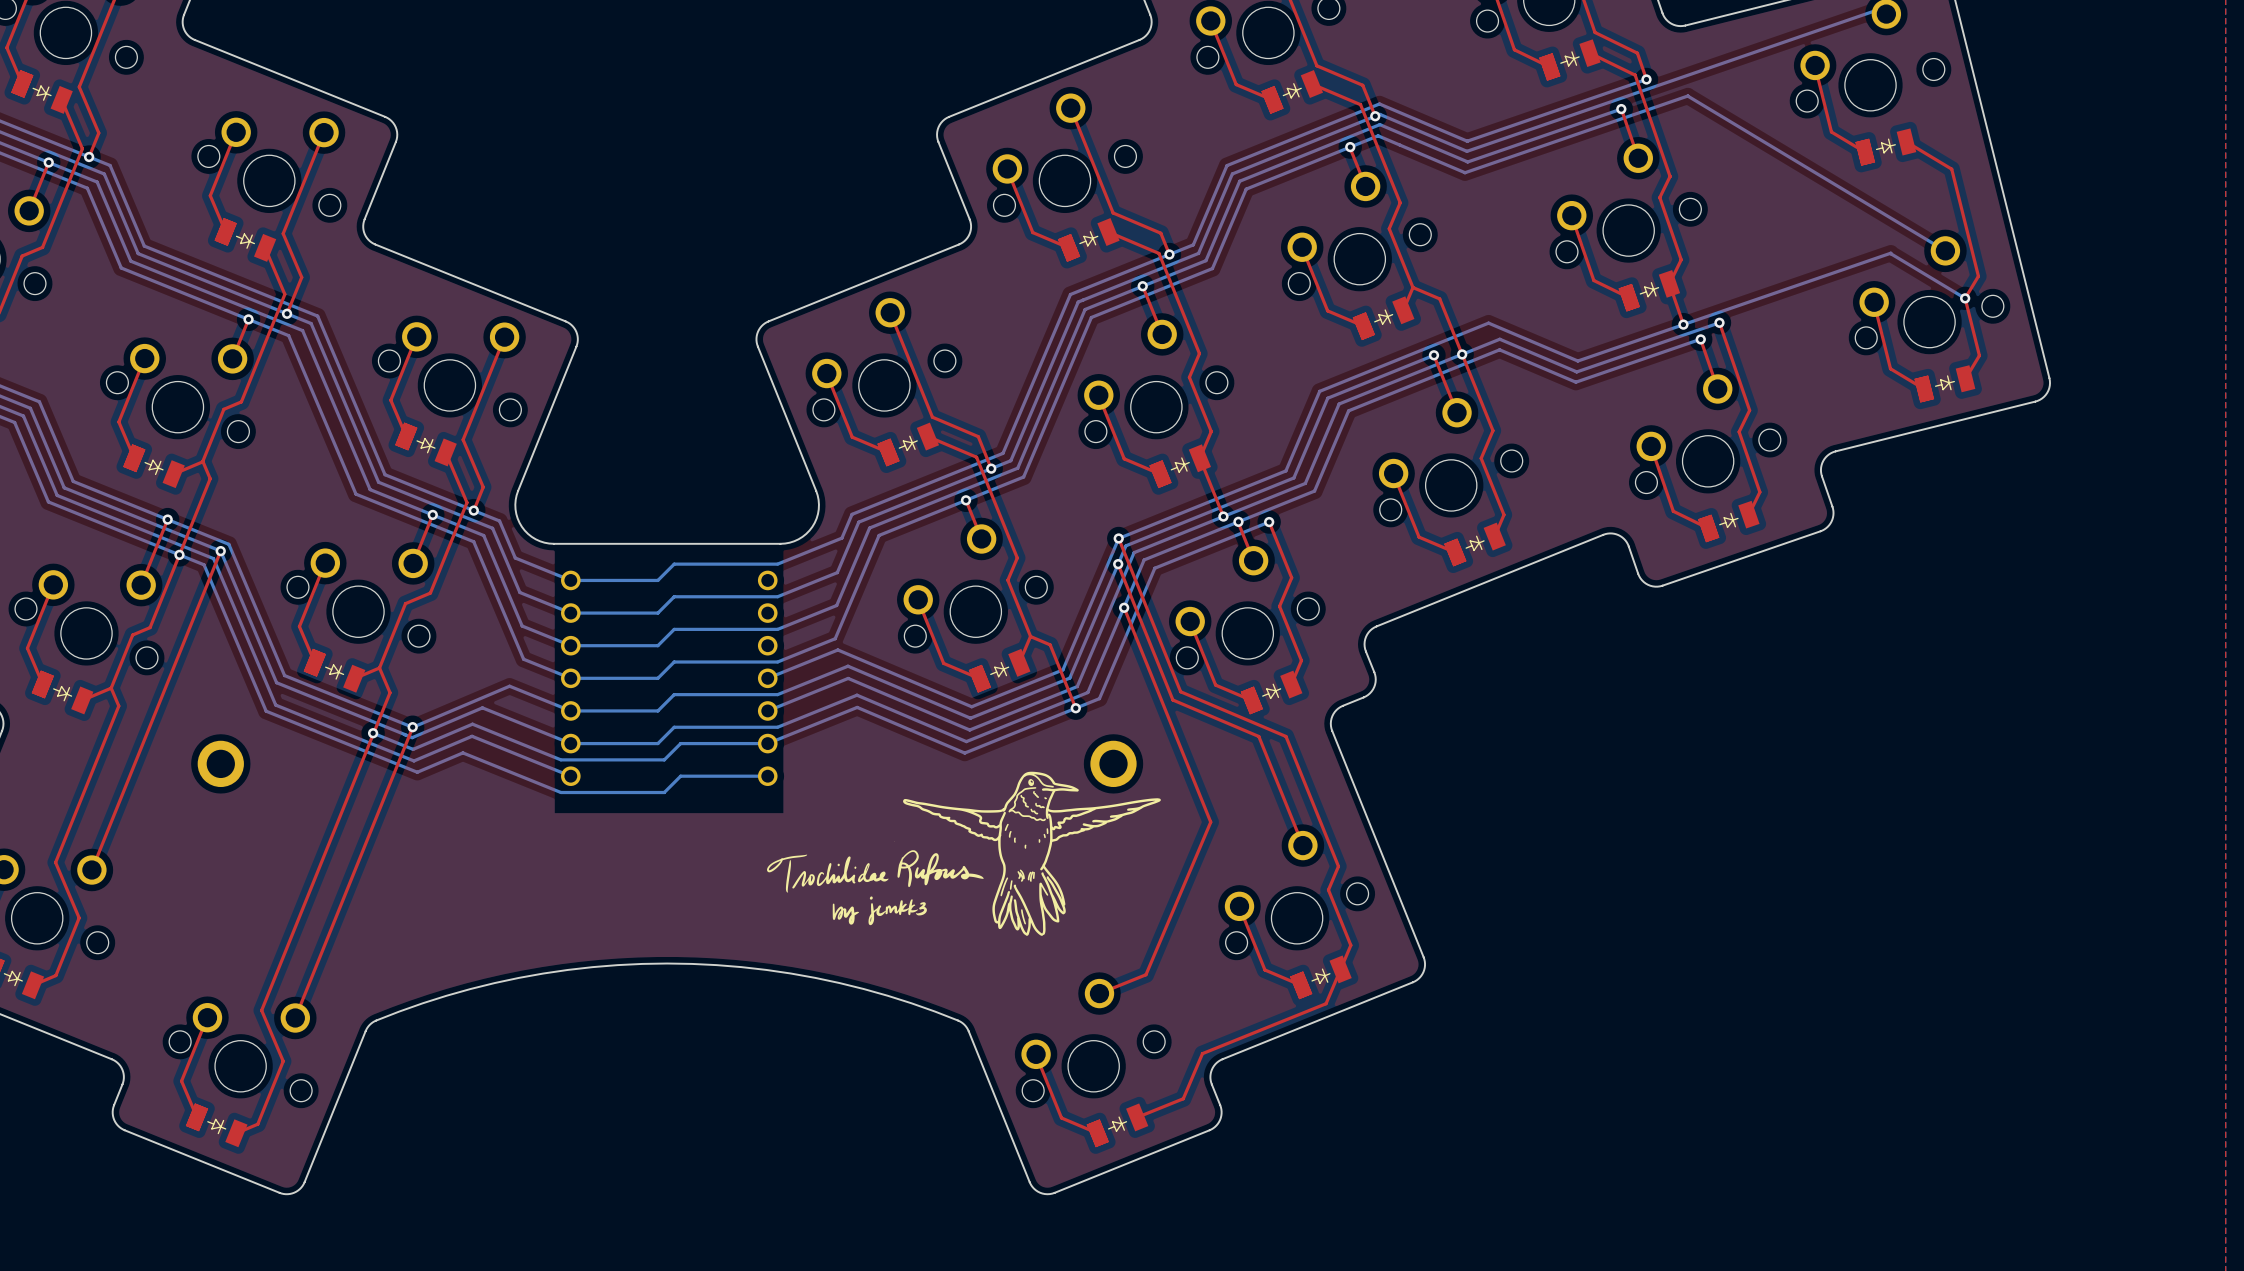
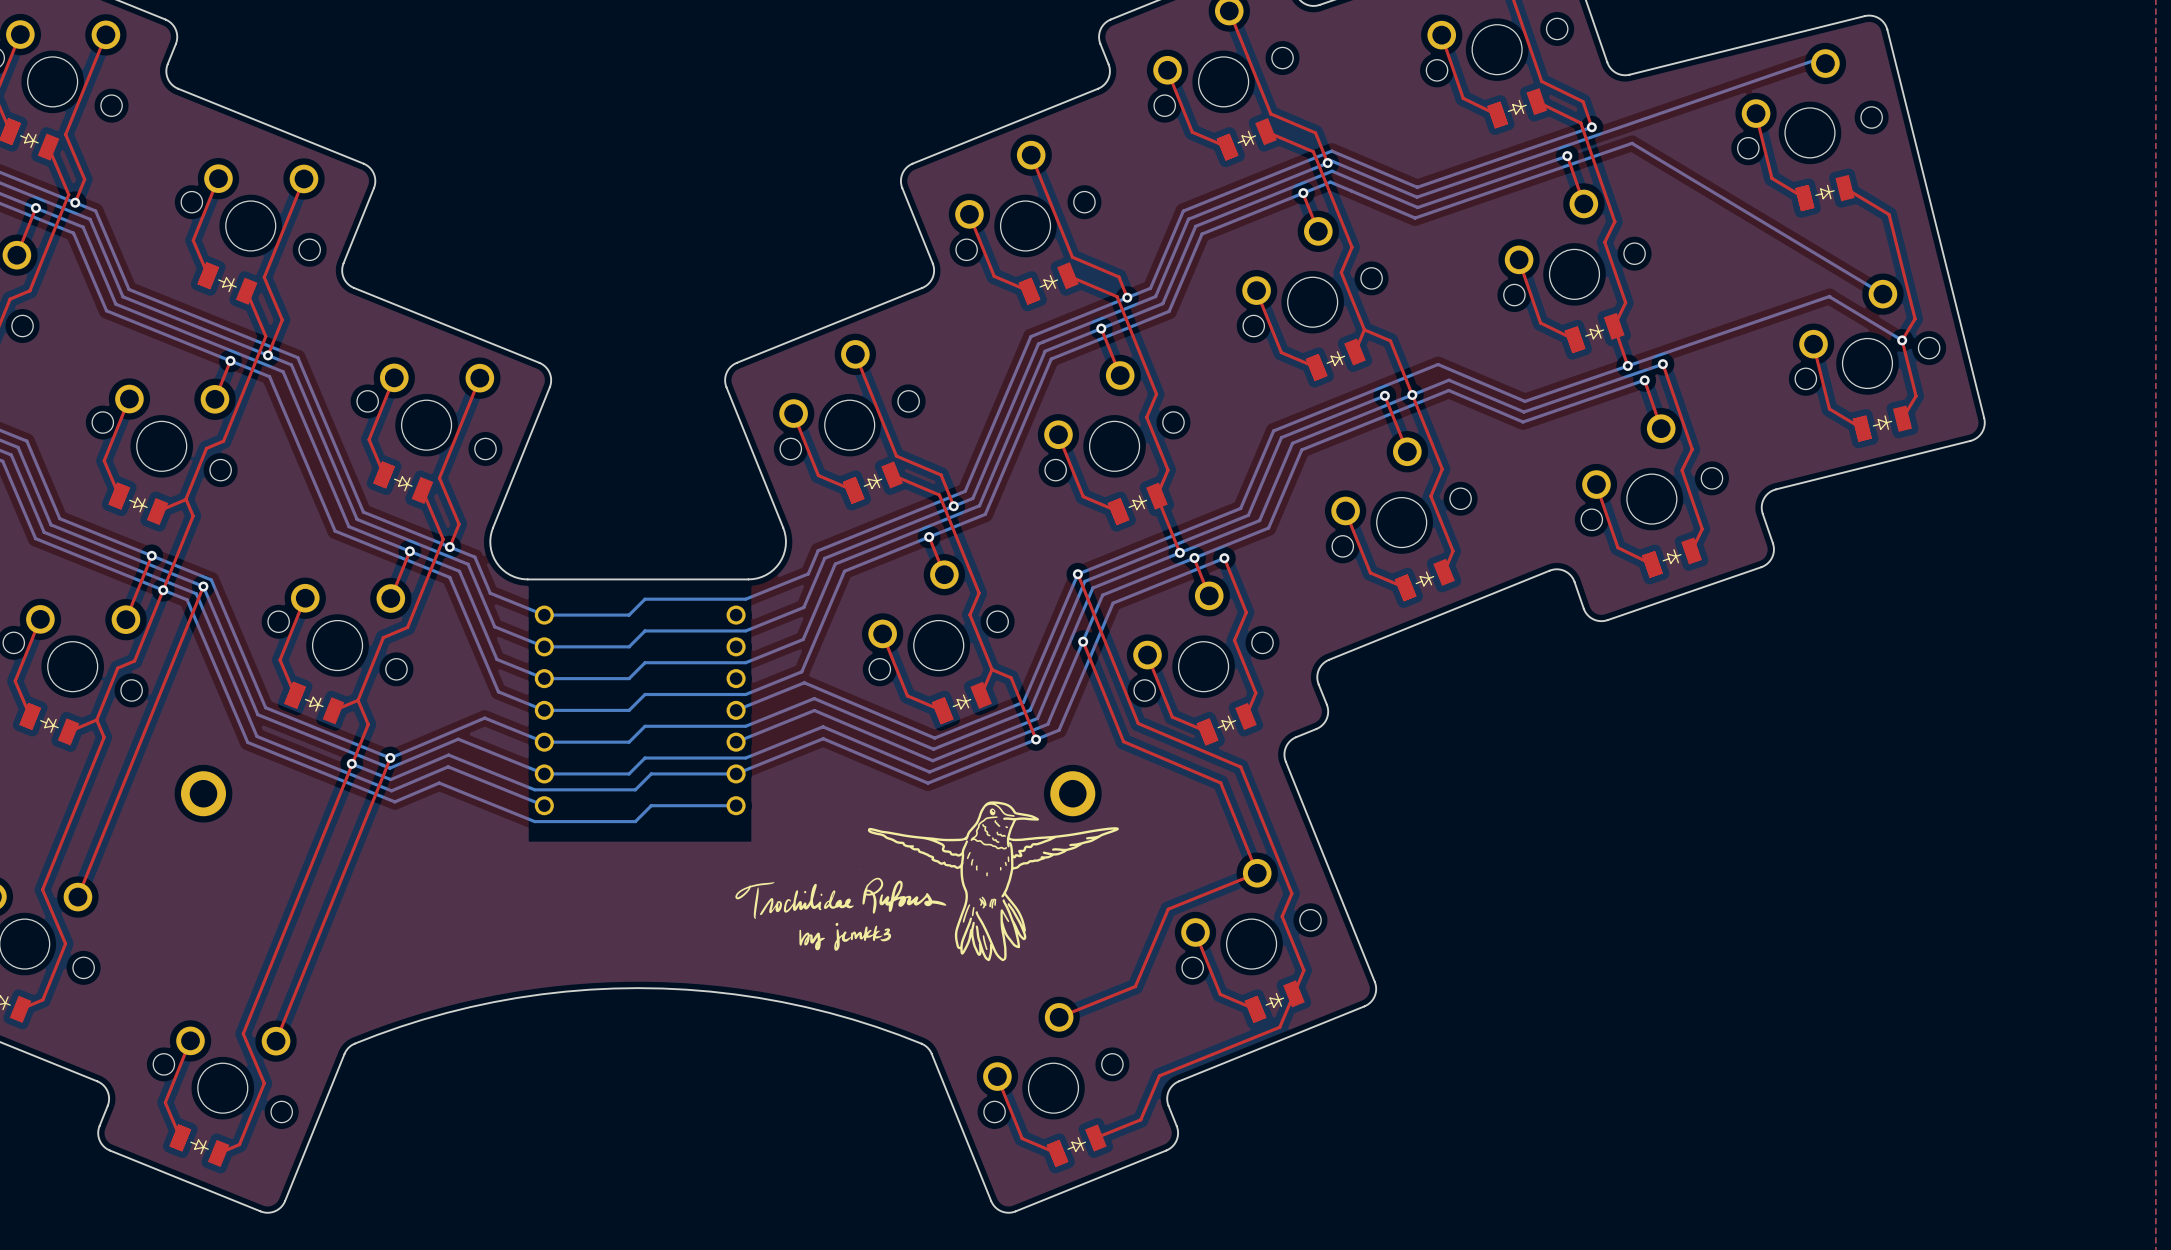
top track: (1118, 564) (1172, 700) (1258, 736) (1265, 752) -> (1123, 741) (1220, 782)
via: (1118, 564) -> none
top track: (1165, 710) (1210, 822) (1145, 974) -> (1257, 873) (1168, 909) (1135, 986) (1104, 999)

